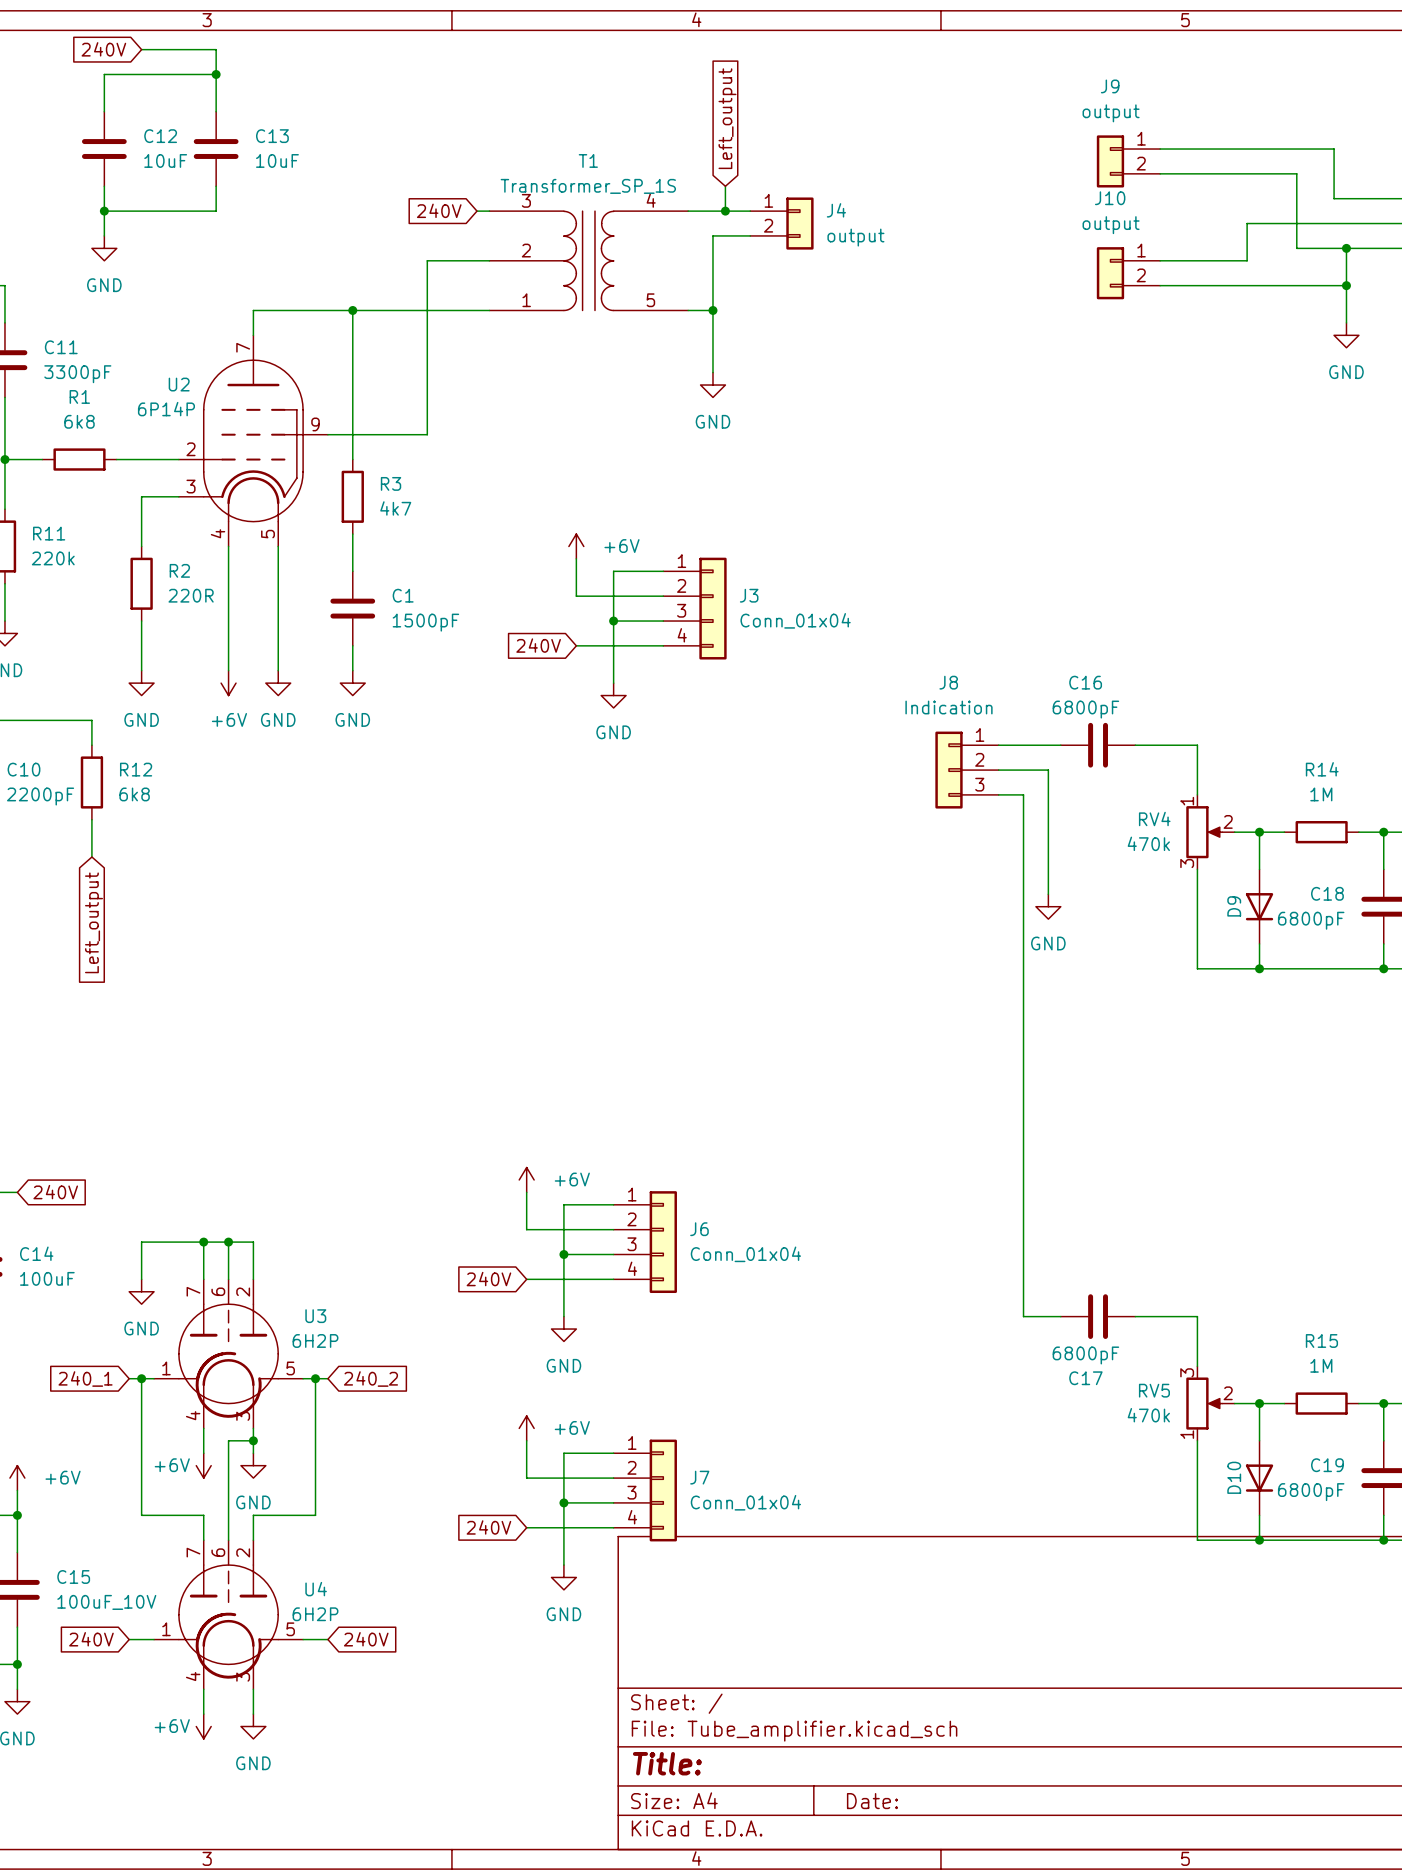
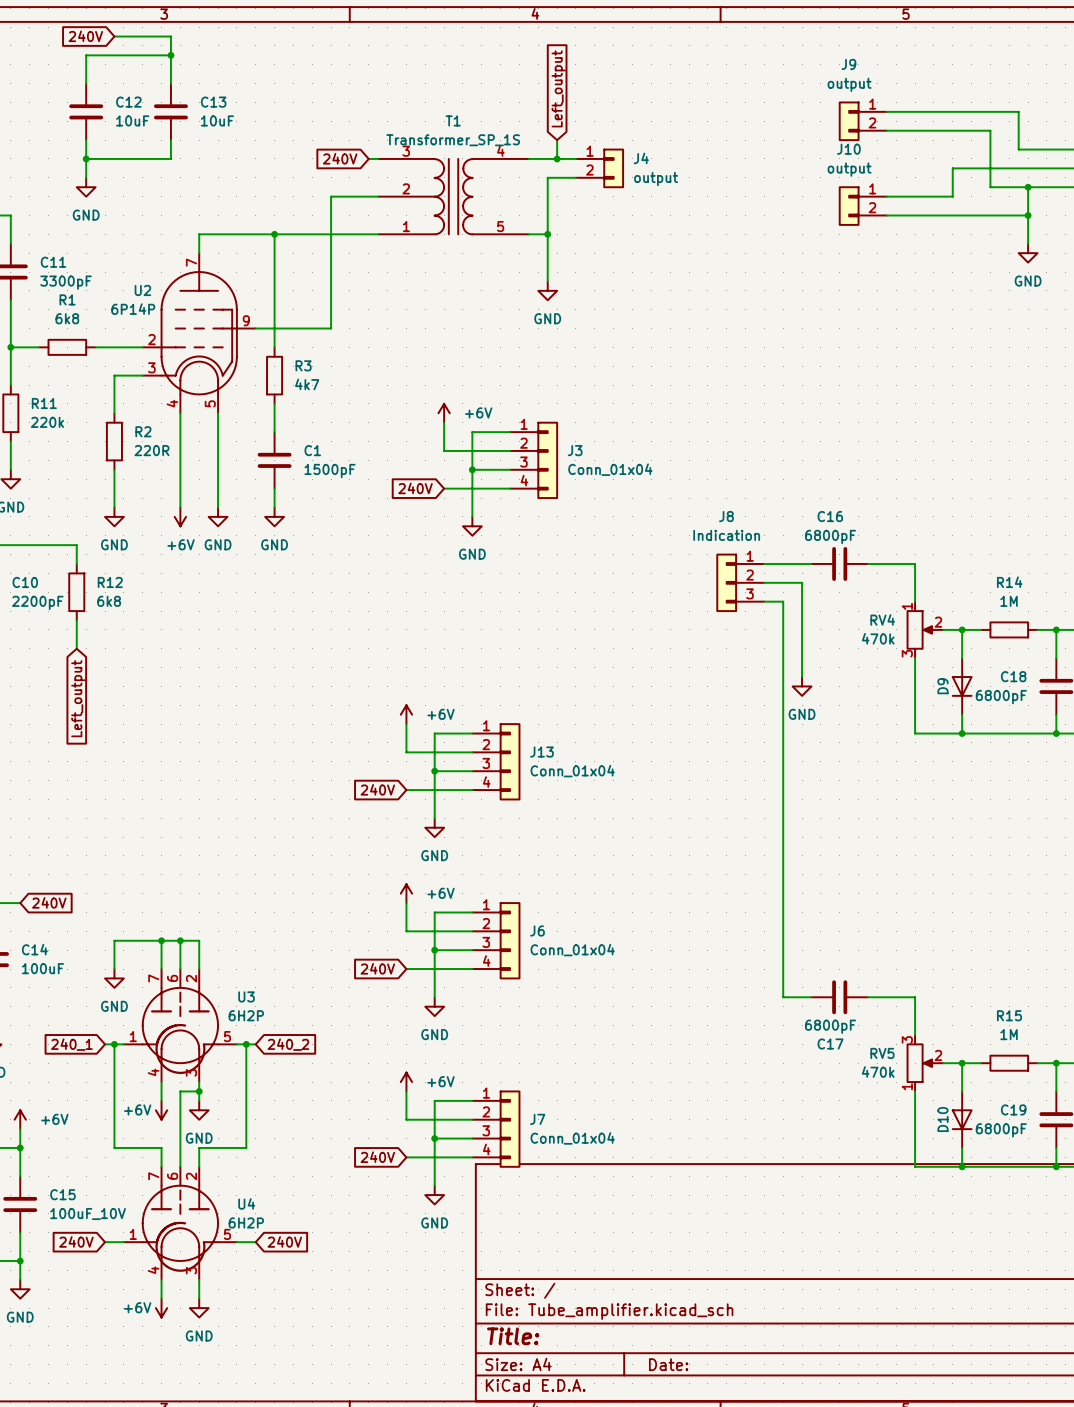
power symbol: none -> +6V (406, 714)
wire: none -> (406, 724) (406, 752) (472, 752)
wire: none -> (472, 733) (434, 733) (434, 818)
J13: none -> Conn_01x04 (496, 761)
wire: none -> (434, 771) (472, 771)
junction: none -> (434, 771)
global label: none -> 240V (377, 789)
wire: none -> (406, 790) (472, 790)
power symbol: none -> GND (434, 827)

